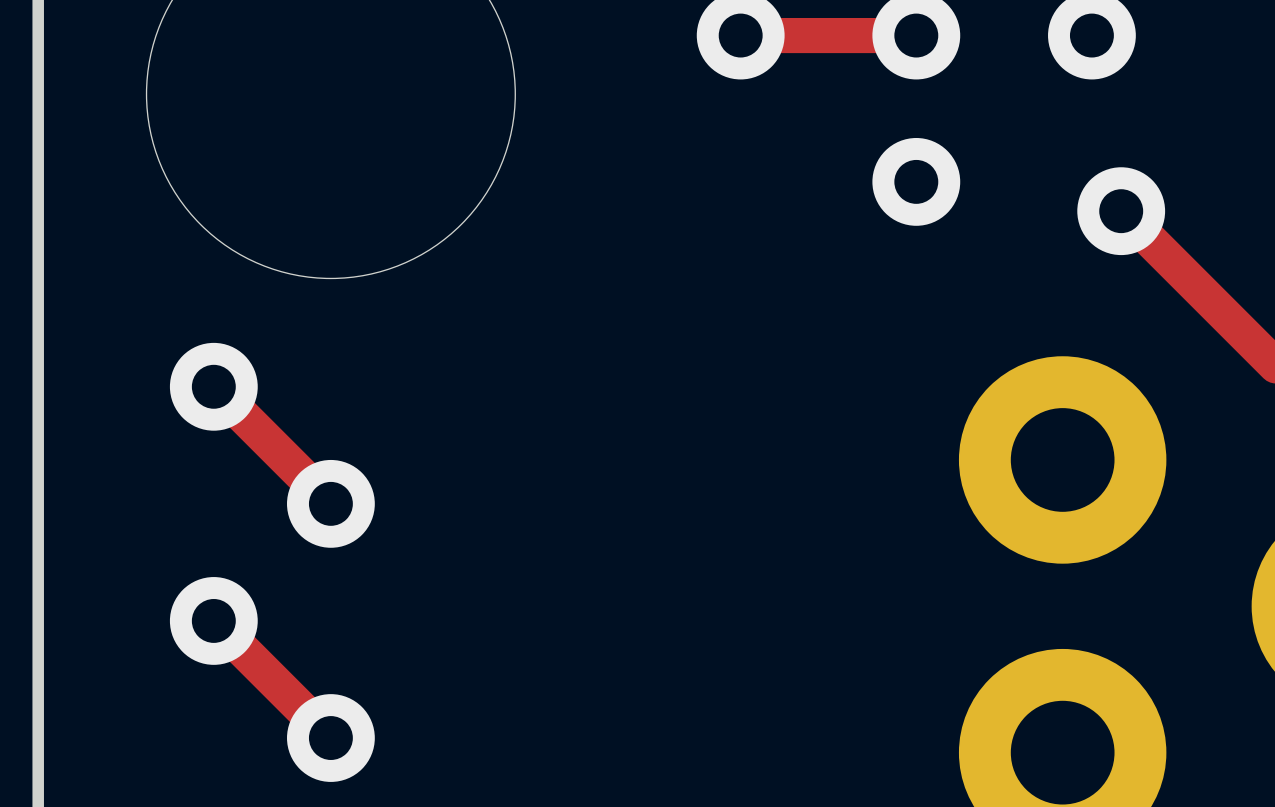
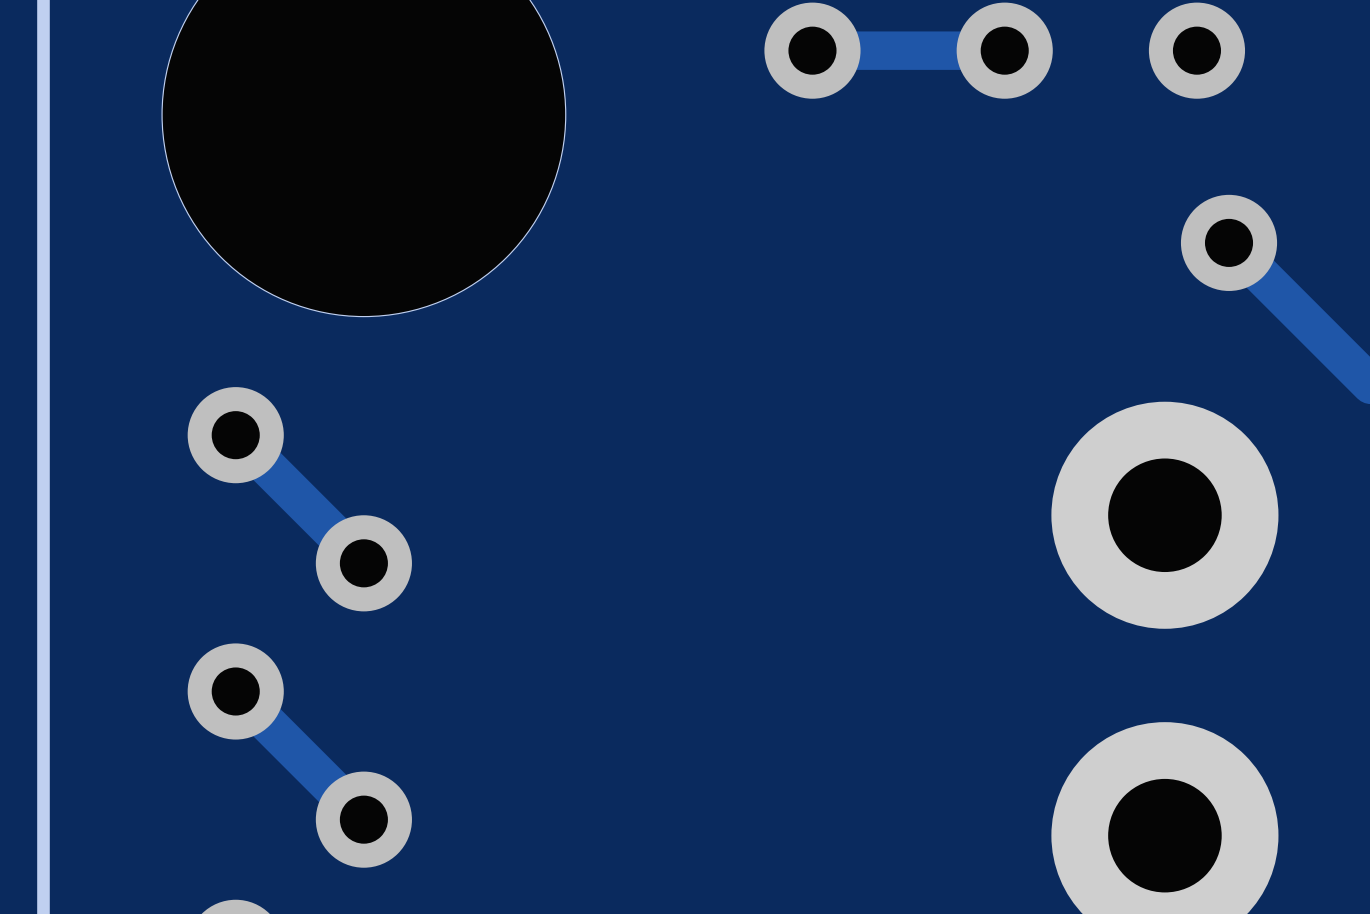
via: (916, 181) -> none

